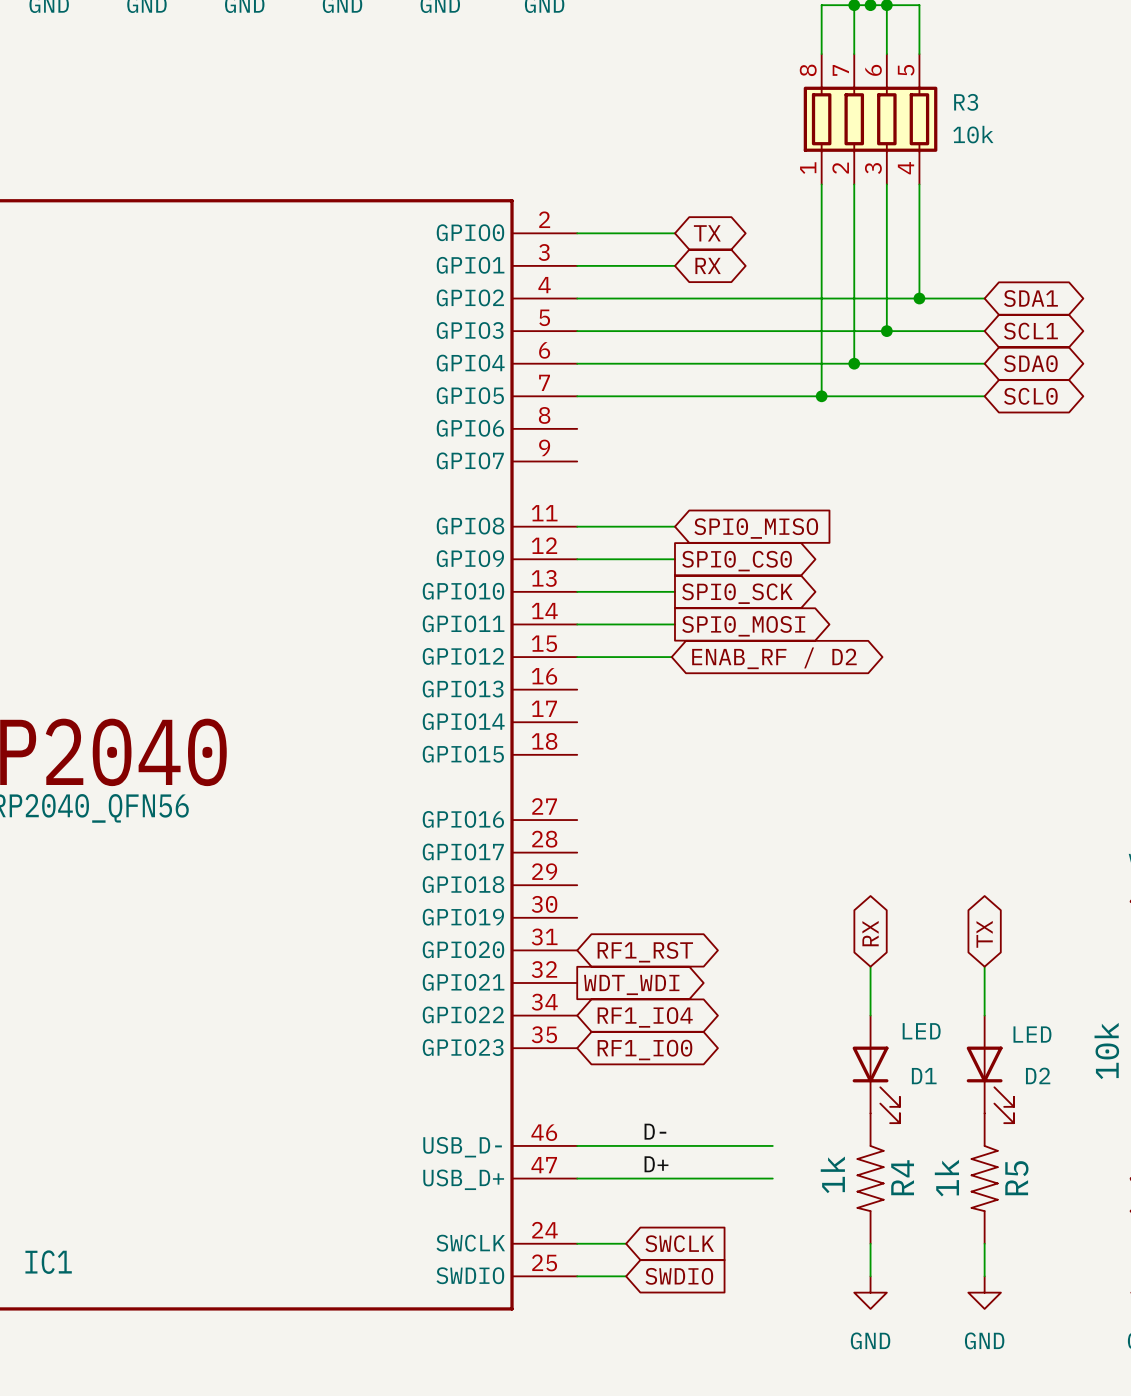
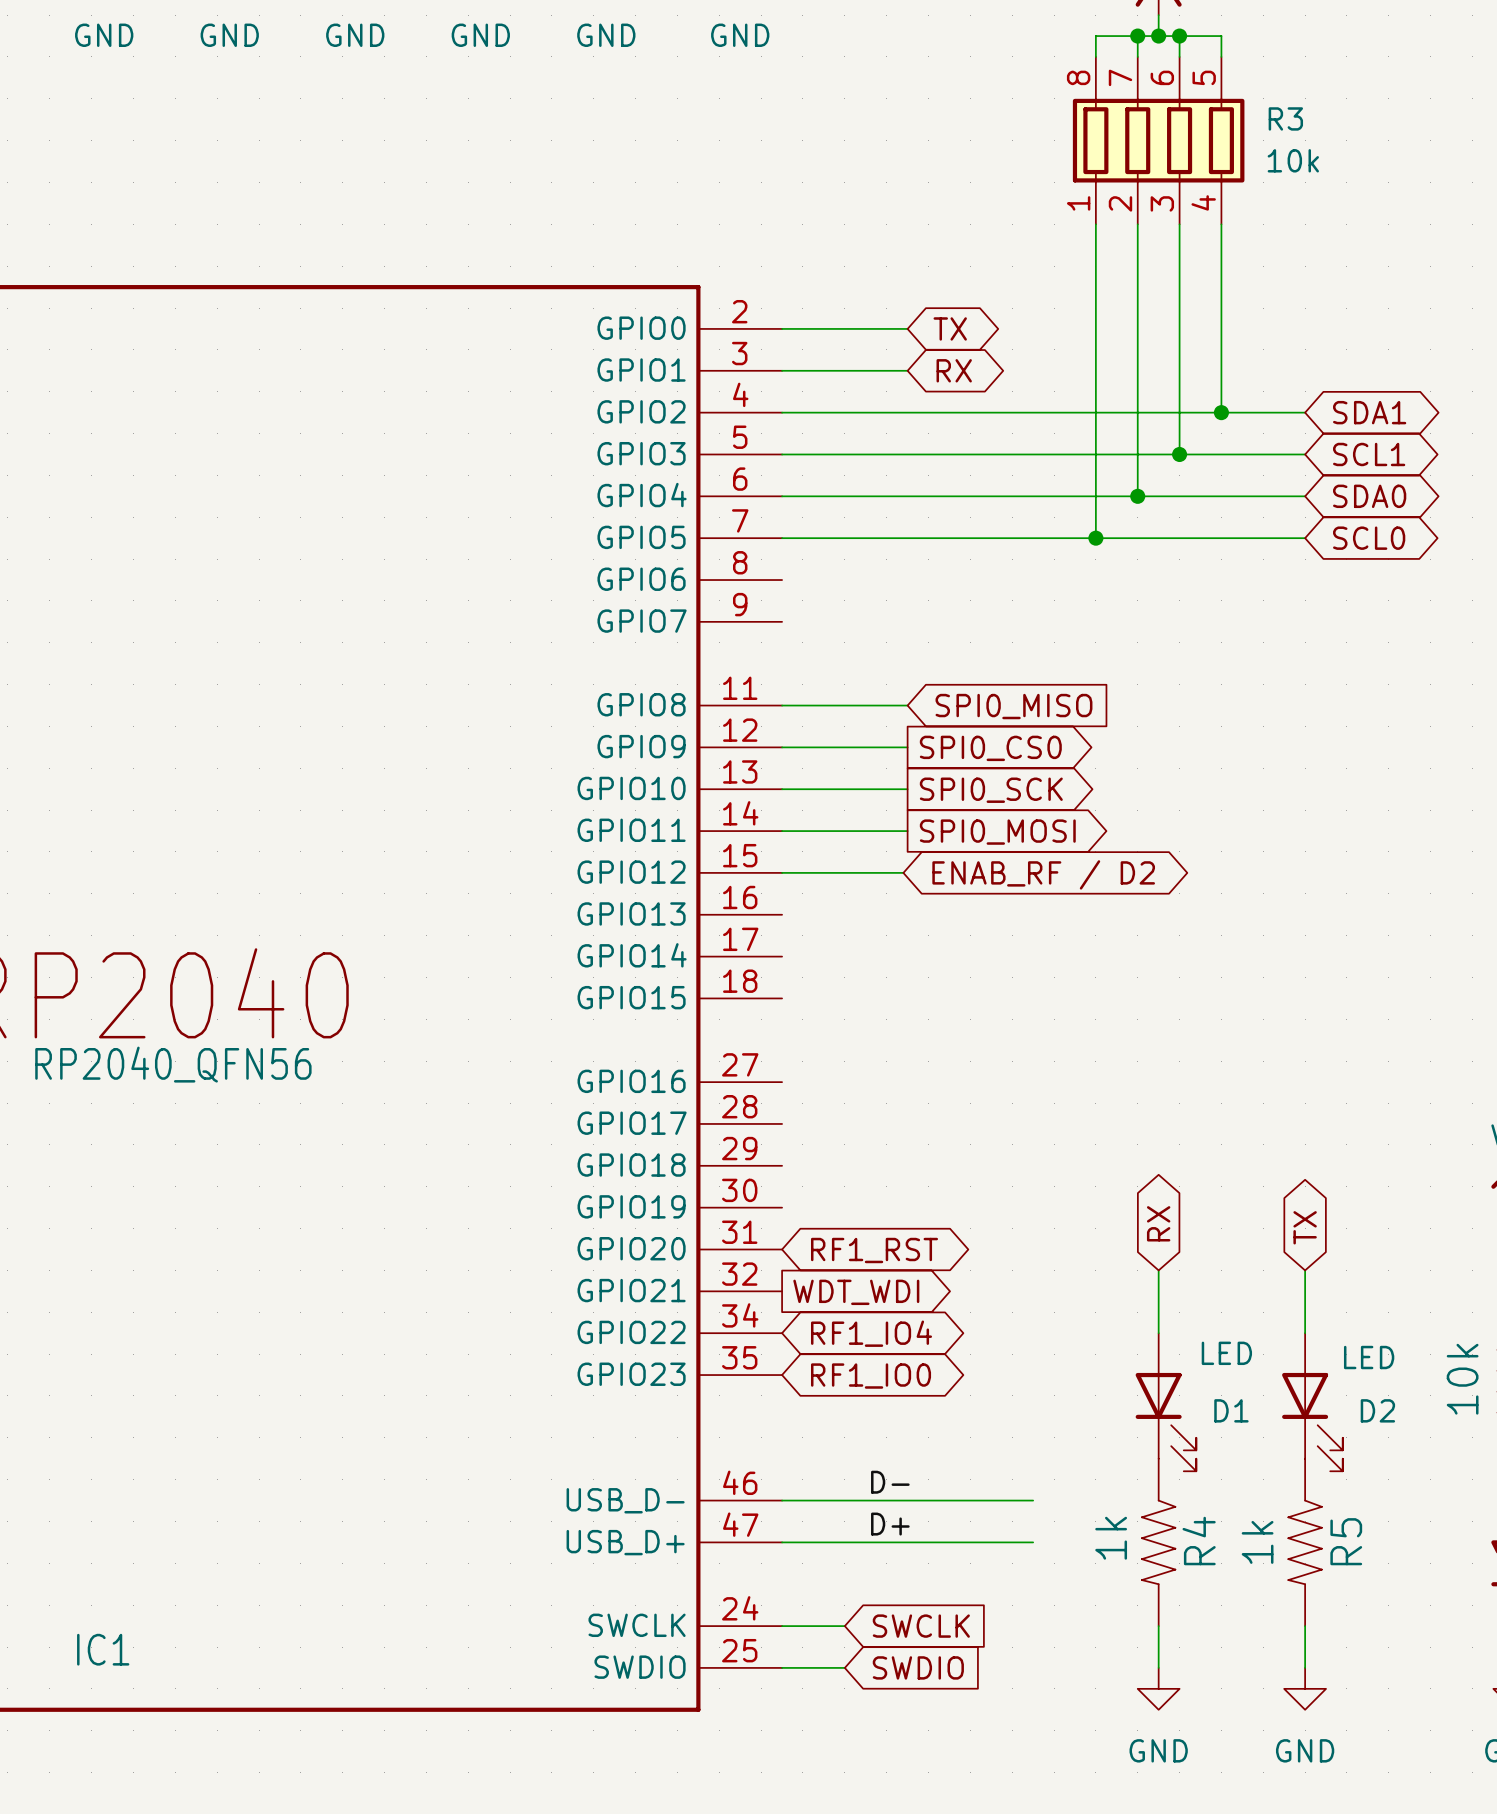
R3 position: (870, 119) -> (1158, 140)

